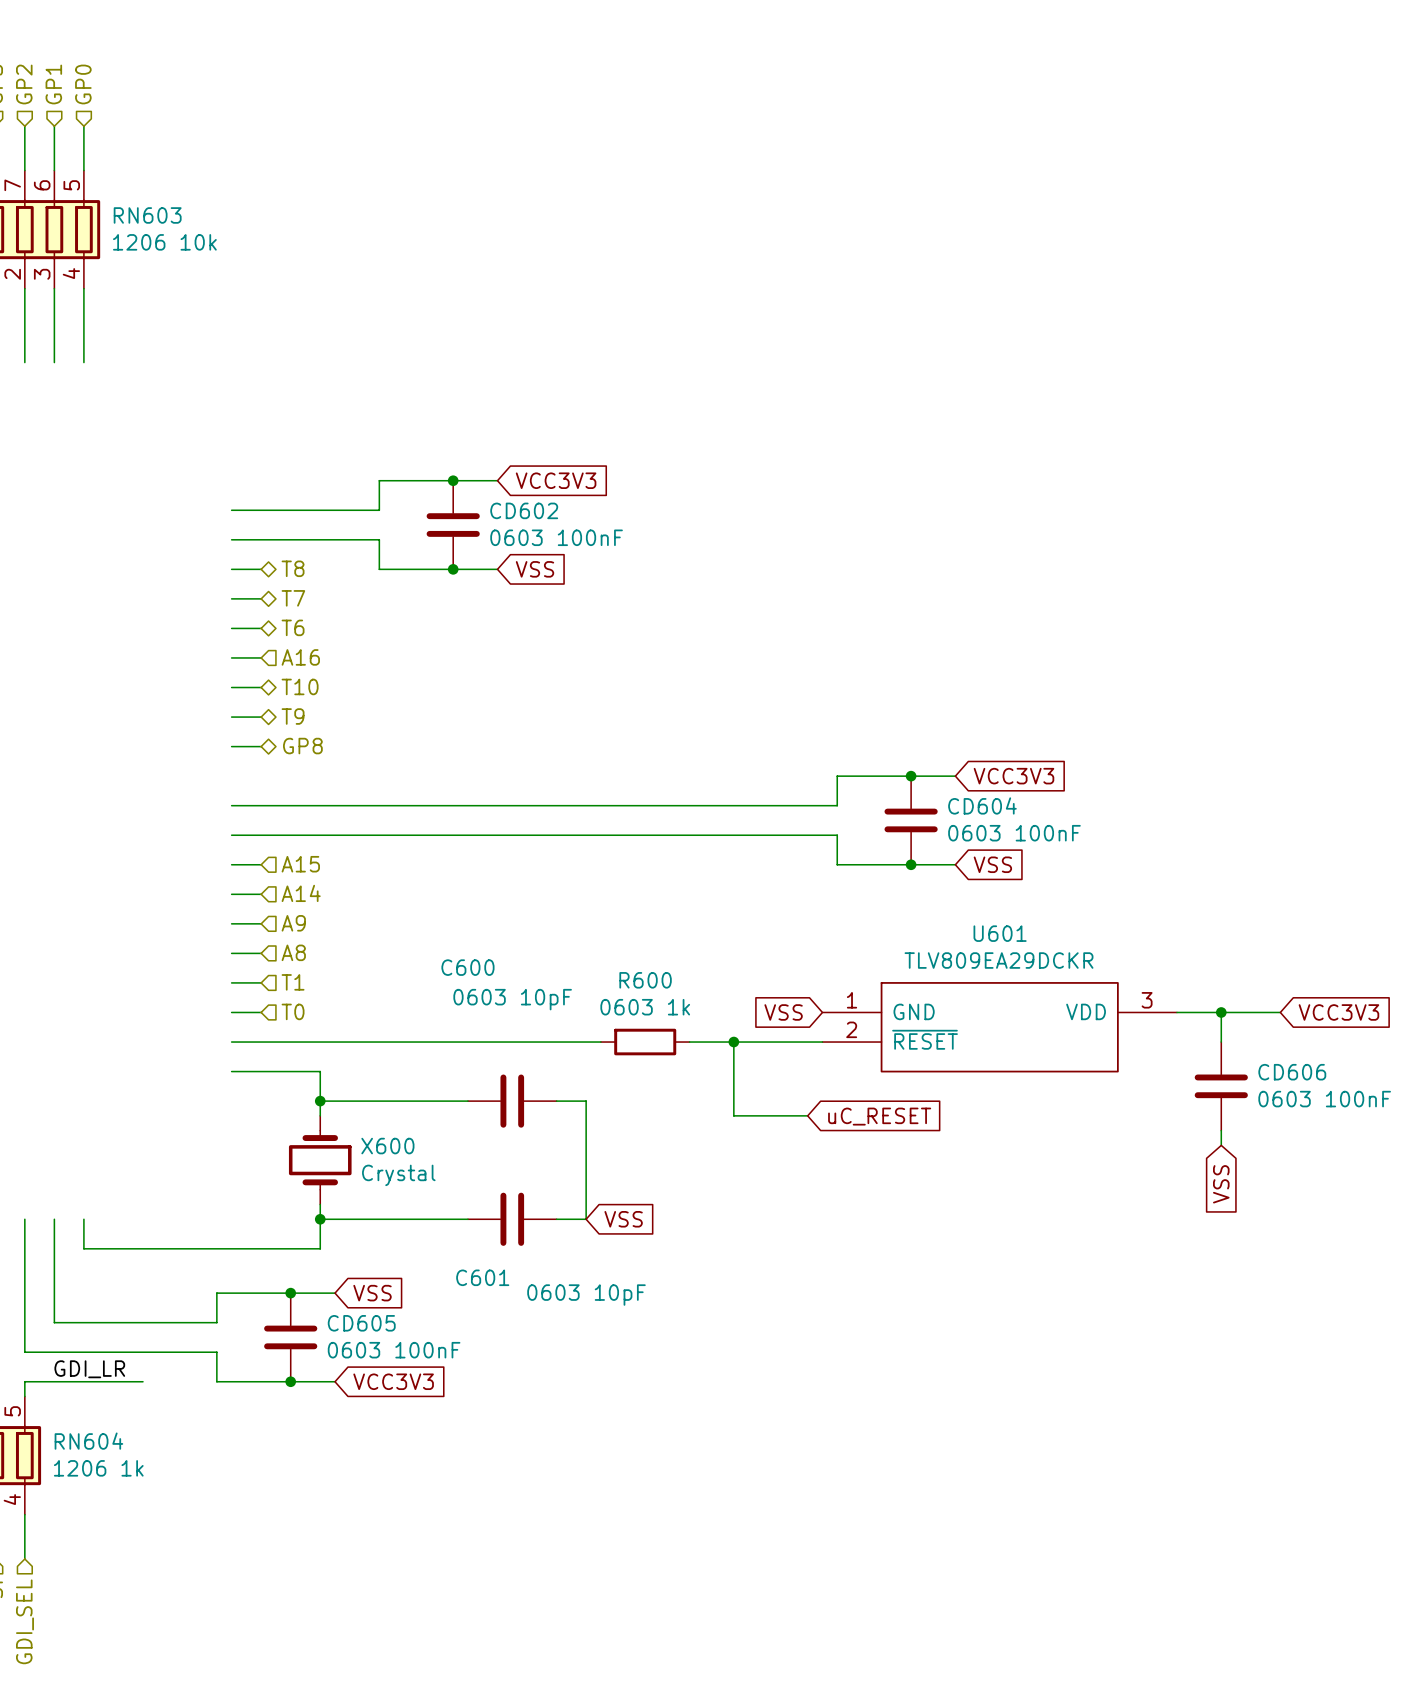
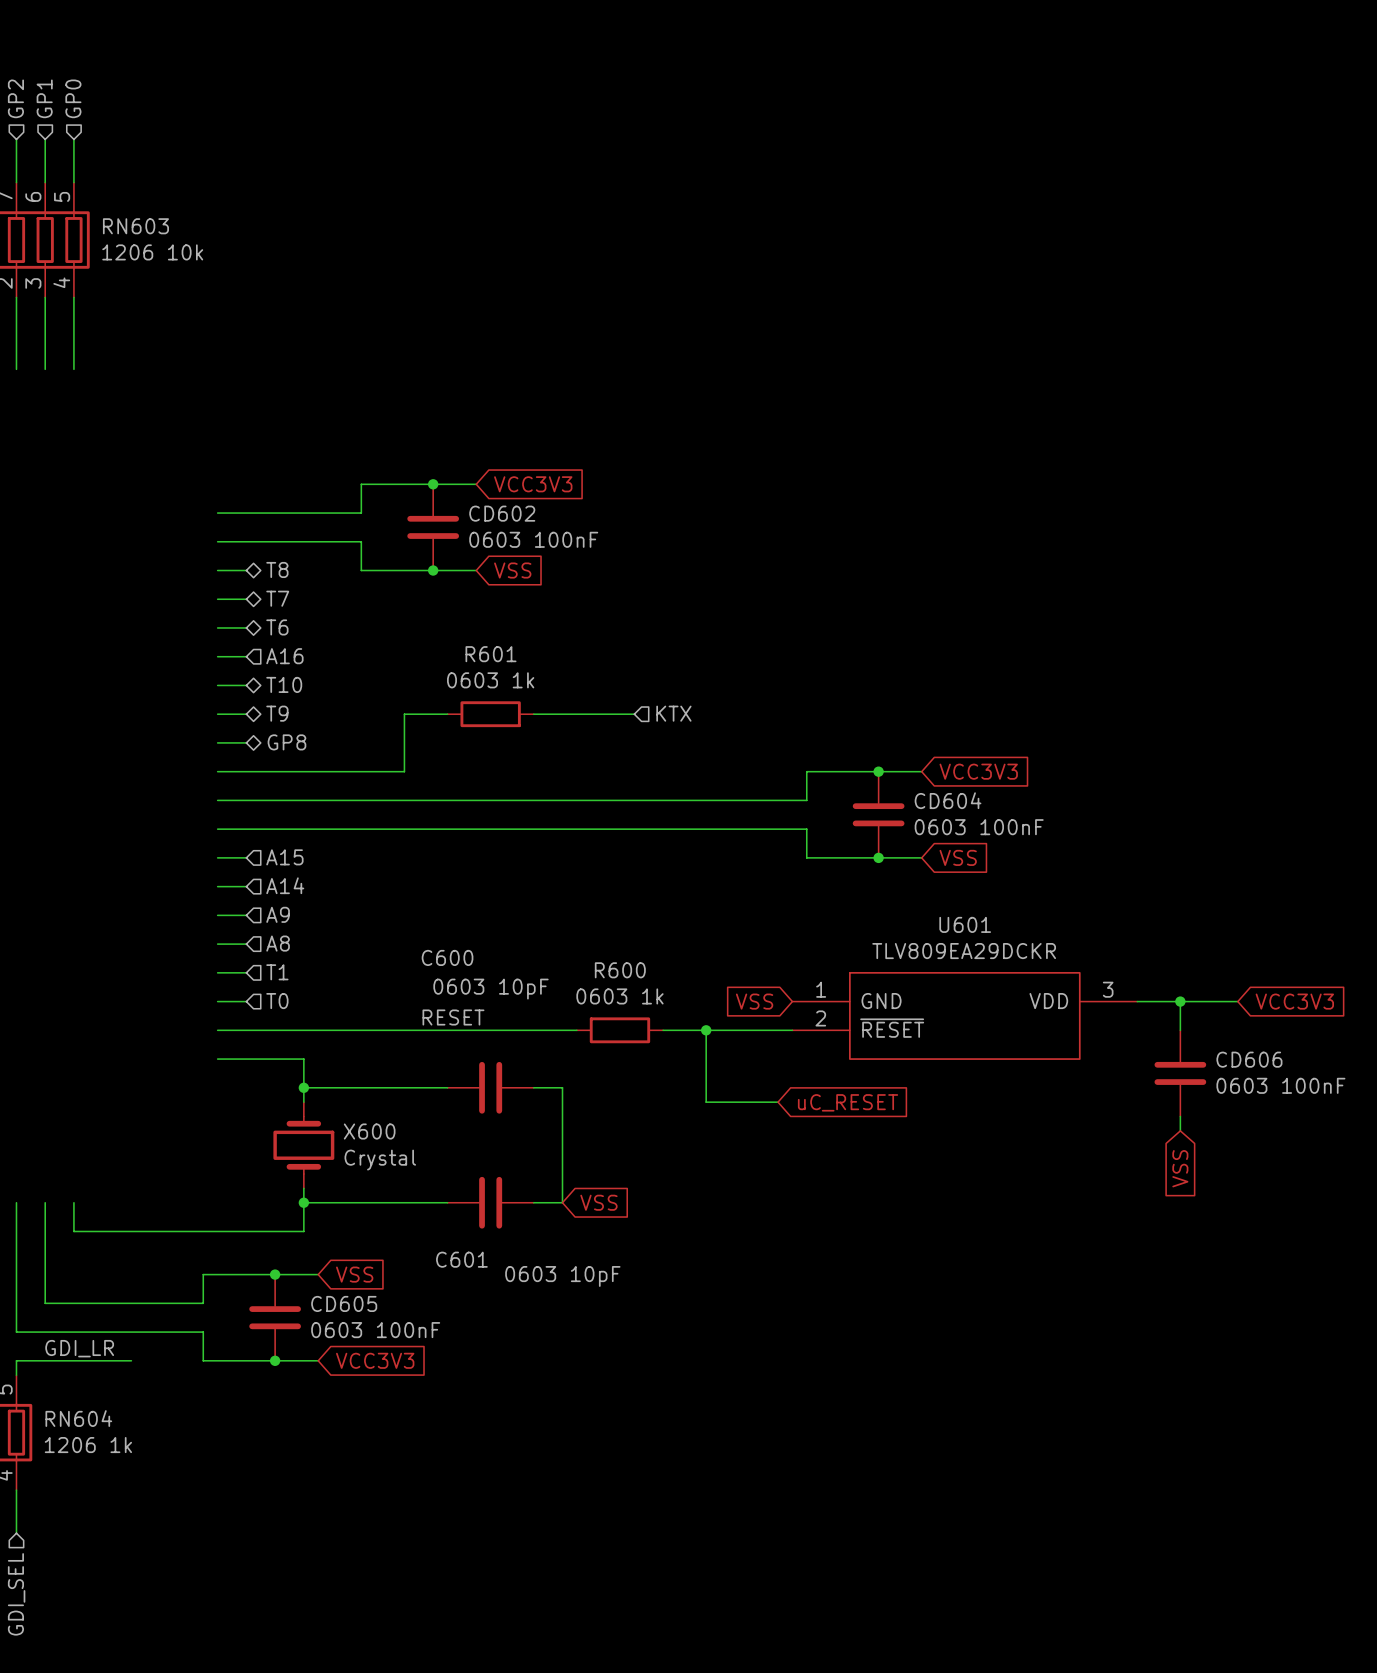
hierarchical label: none -> KTX (673, 713)
wire: none -> (447, 714) (404, 714) (404, 771) (217, 771)
R601: none -> 0603 1k (490, 714)
wire: none -> (533, 714) (634, 714)
label: none -> RESET (453, 1017)

